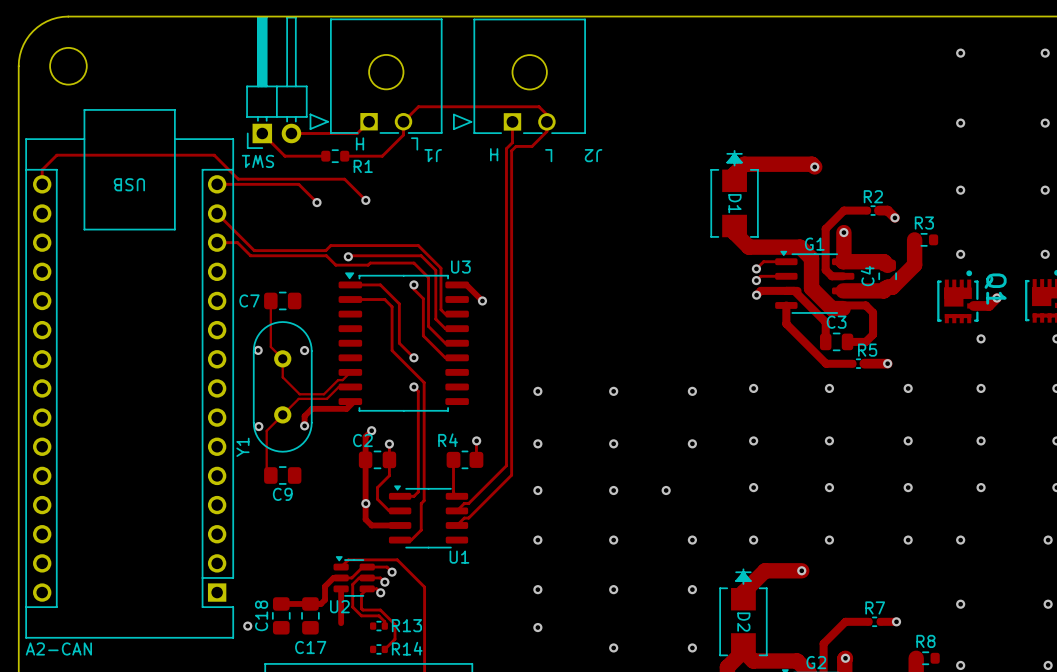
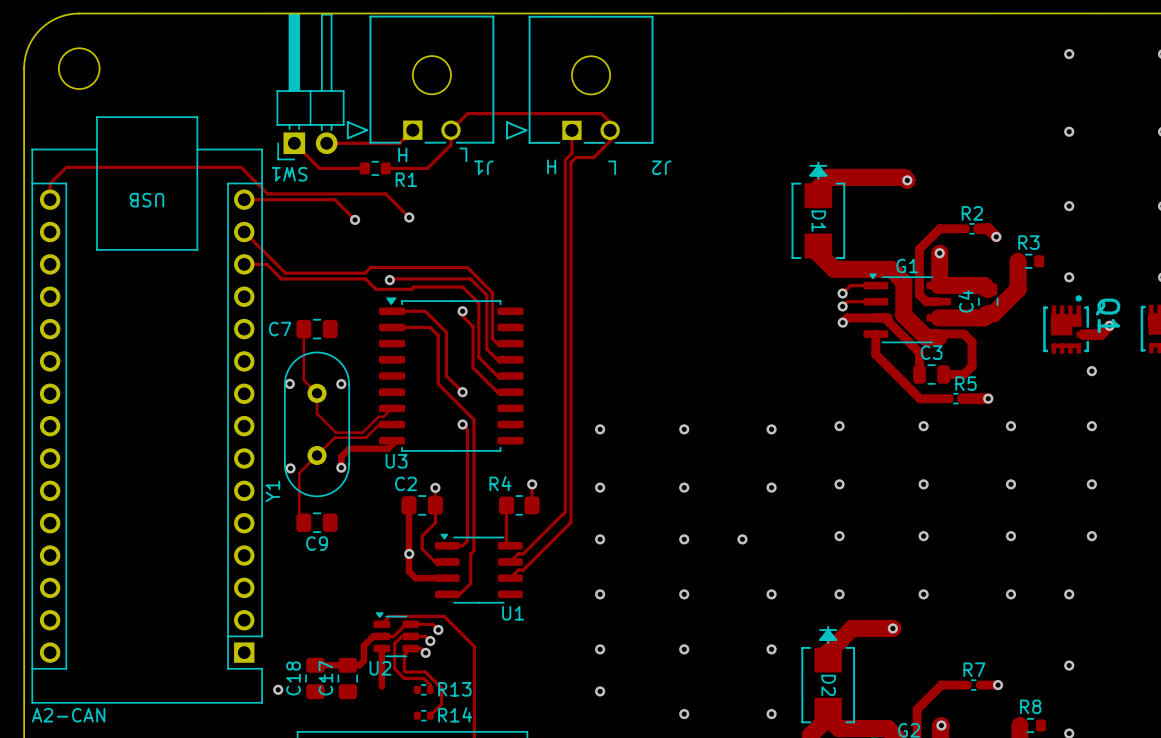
U3 name position: U3 (460, 267) -> U3 (396, 461)
track: (457, 284) (466, 284) (482, 300) -> none
via: (482, 300) -> none
track: (371, 430) (365, 436) (365, 459) -> none
via: (371, 430) -> none
C17 name rotation: 0° (310, 647) -> 90° counterclockwise (325, 678)

